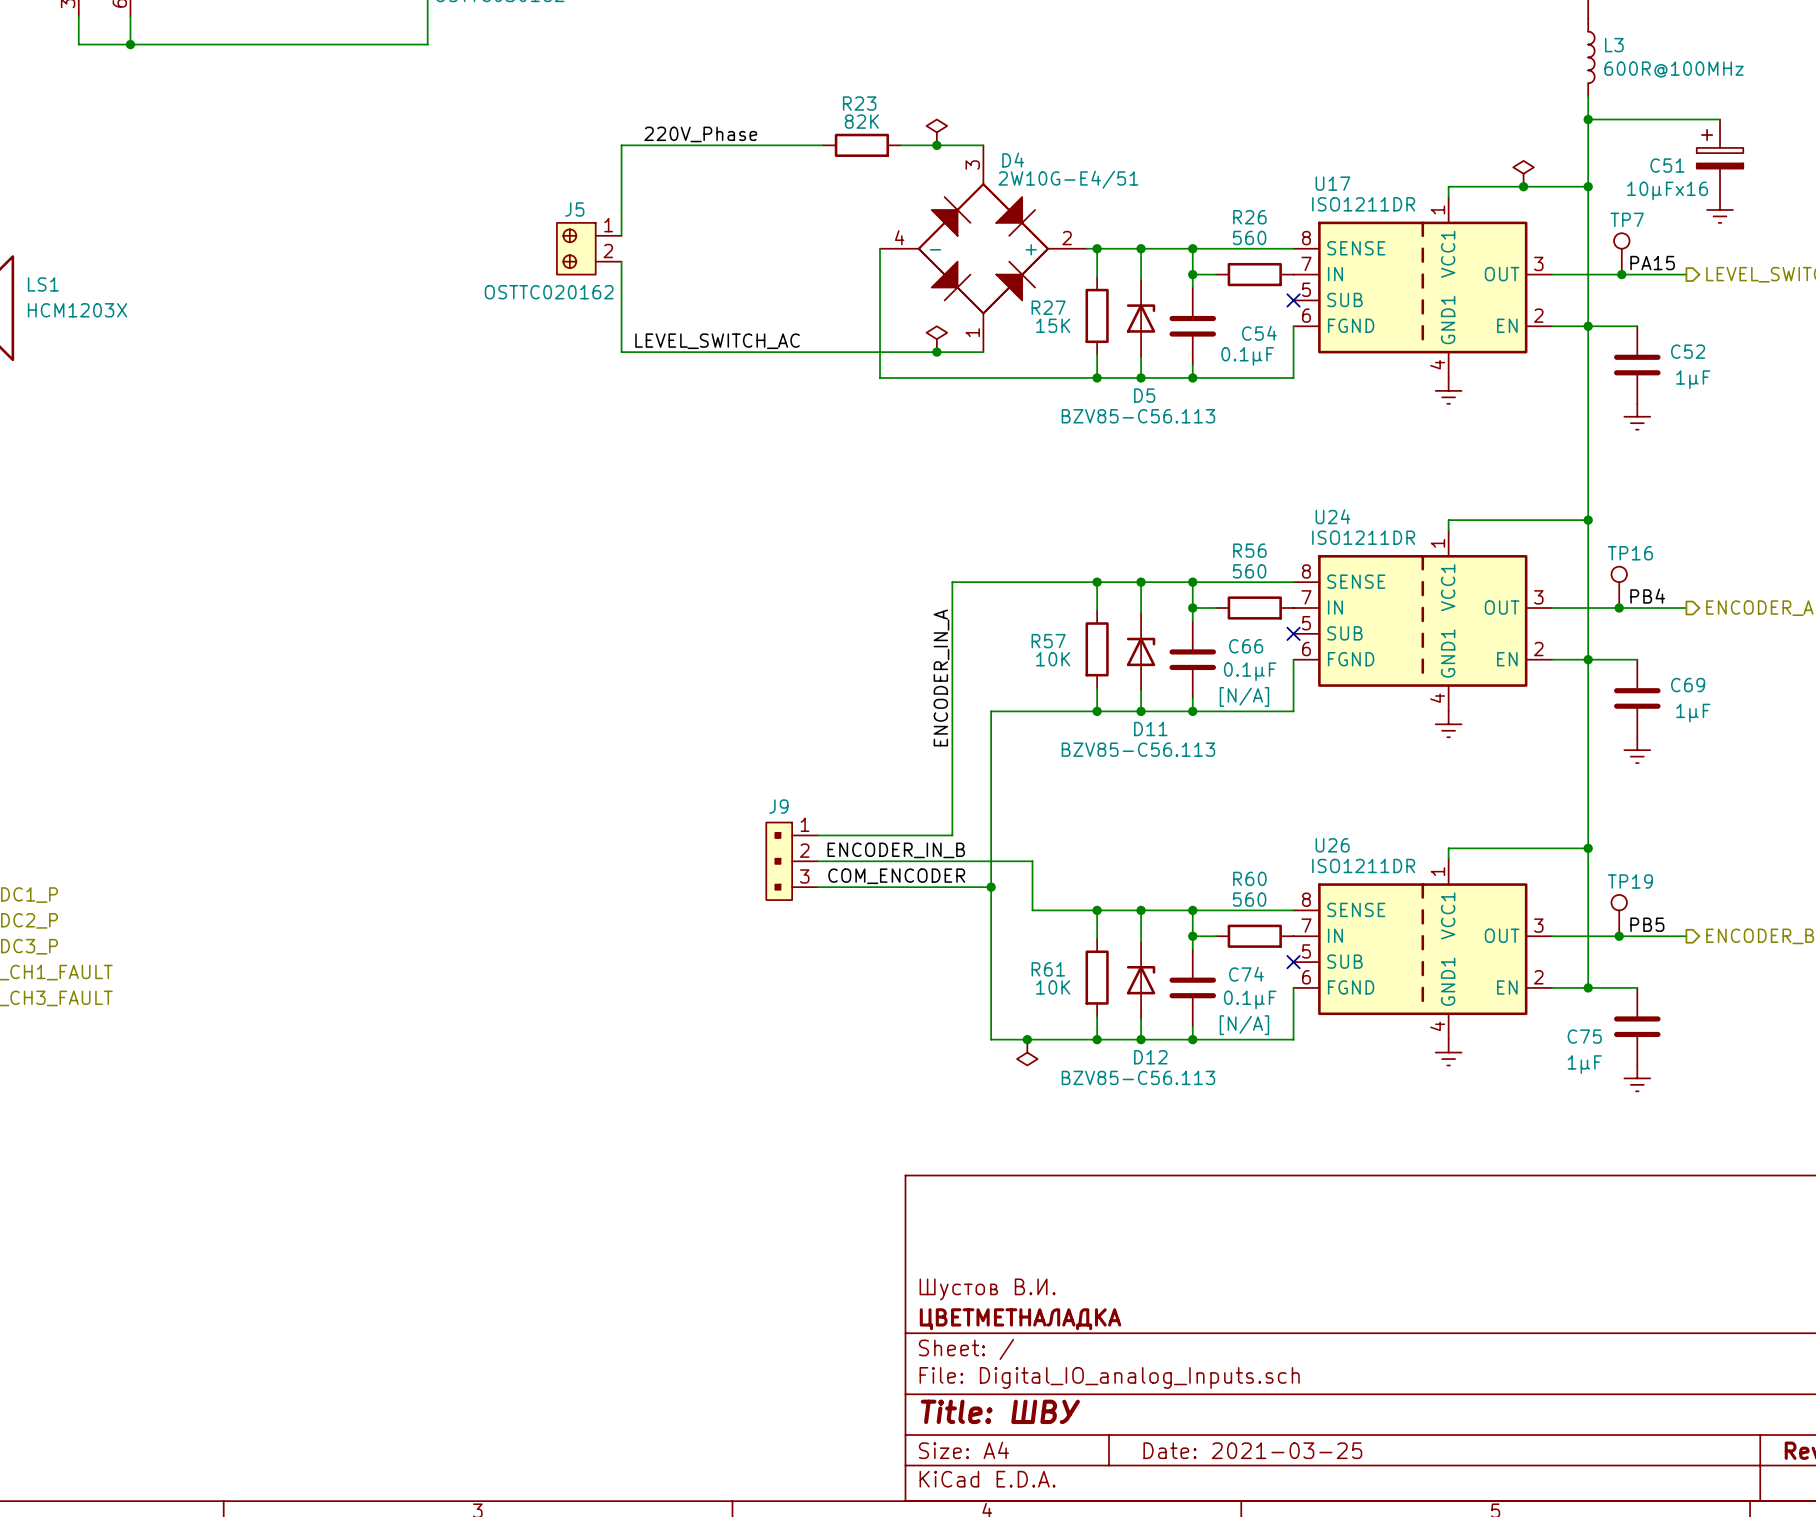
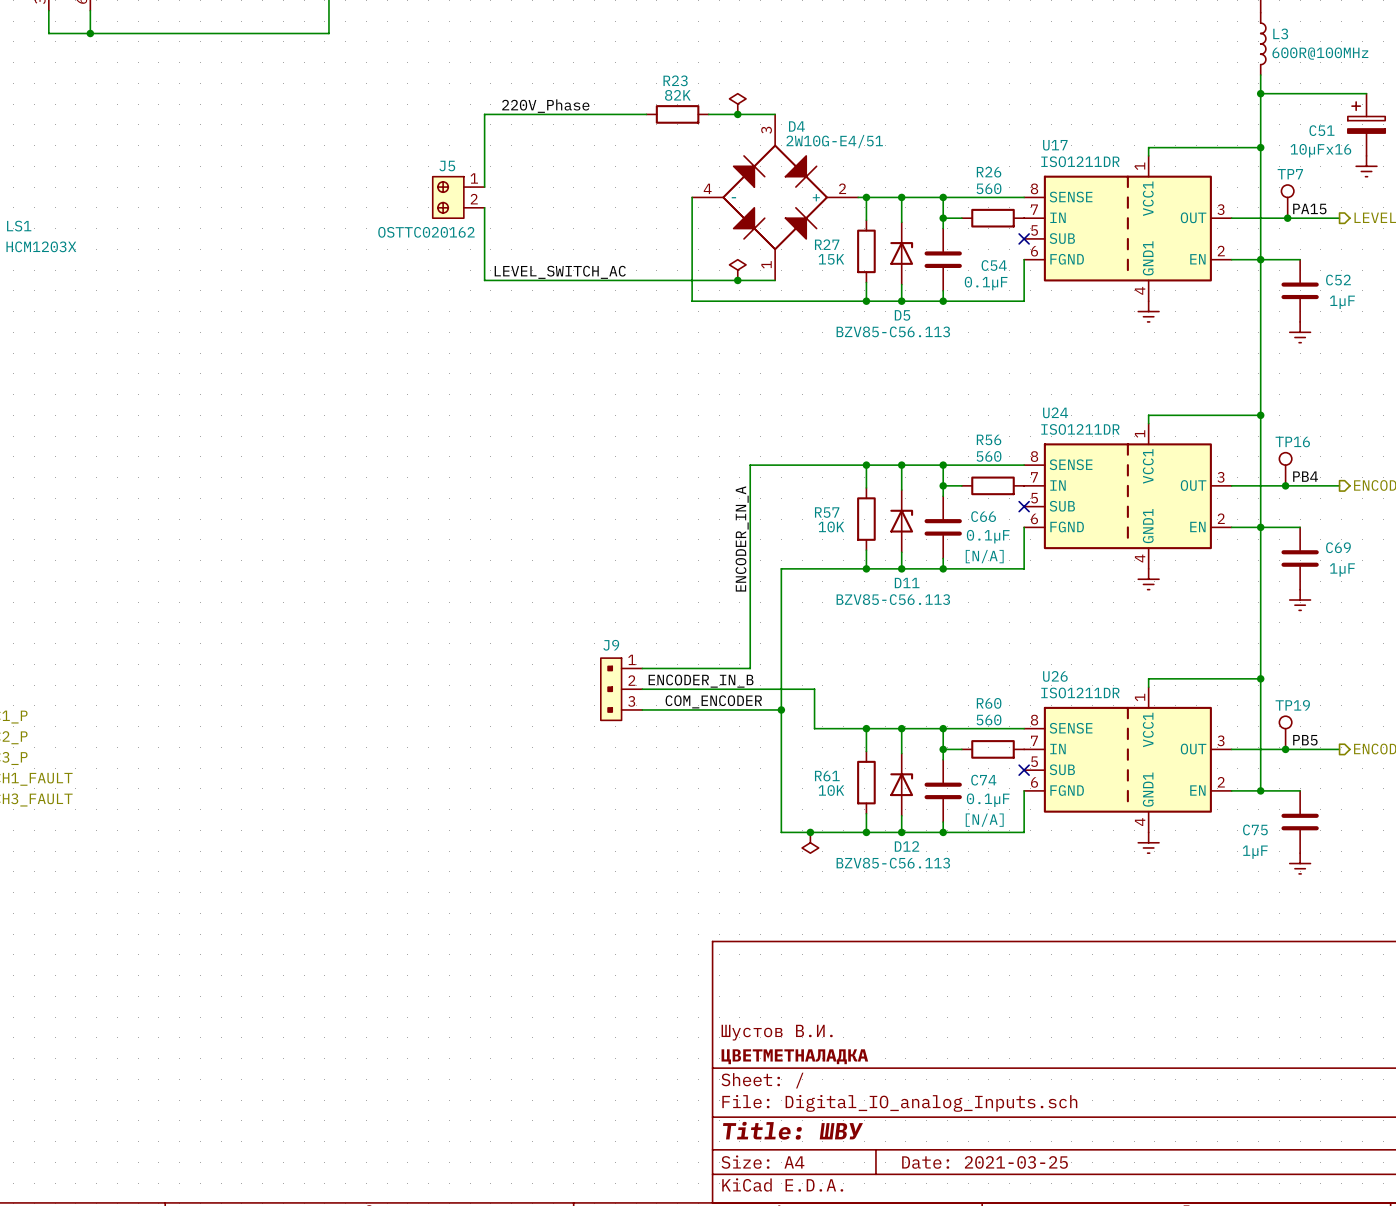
power symbol: (1523, 173) -> none
junction: (1523, 186) -> none

